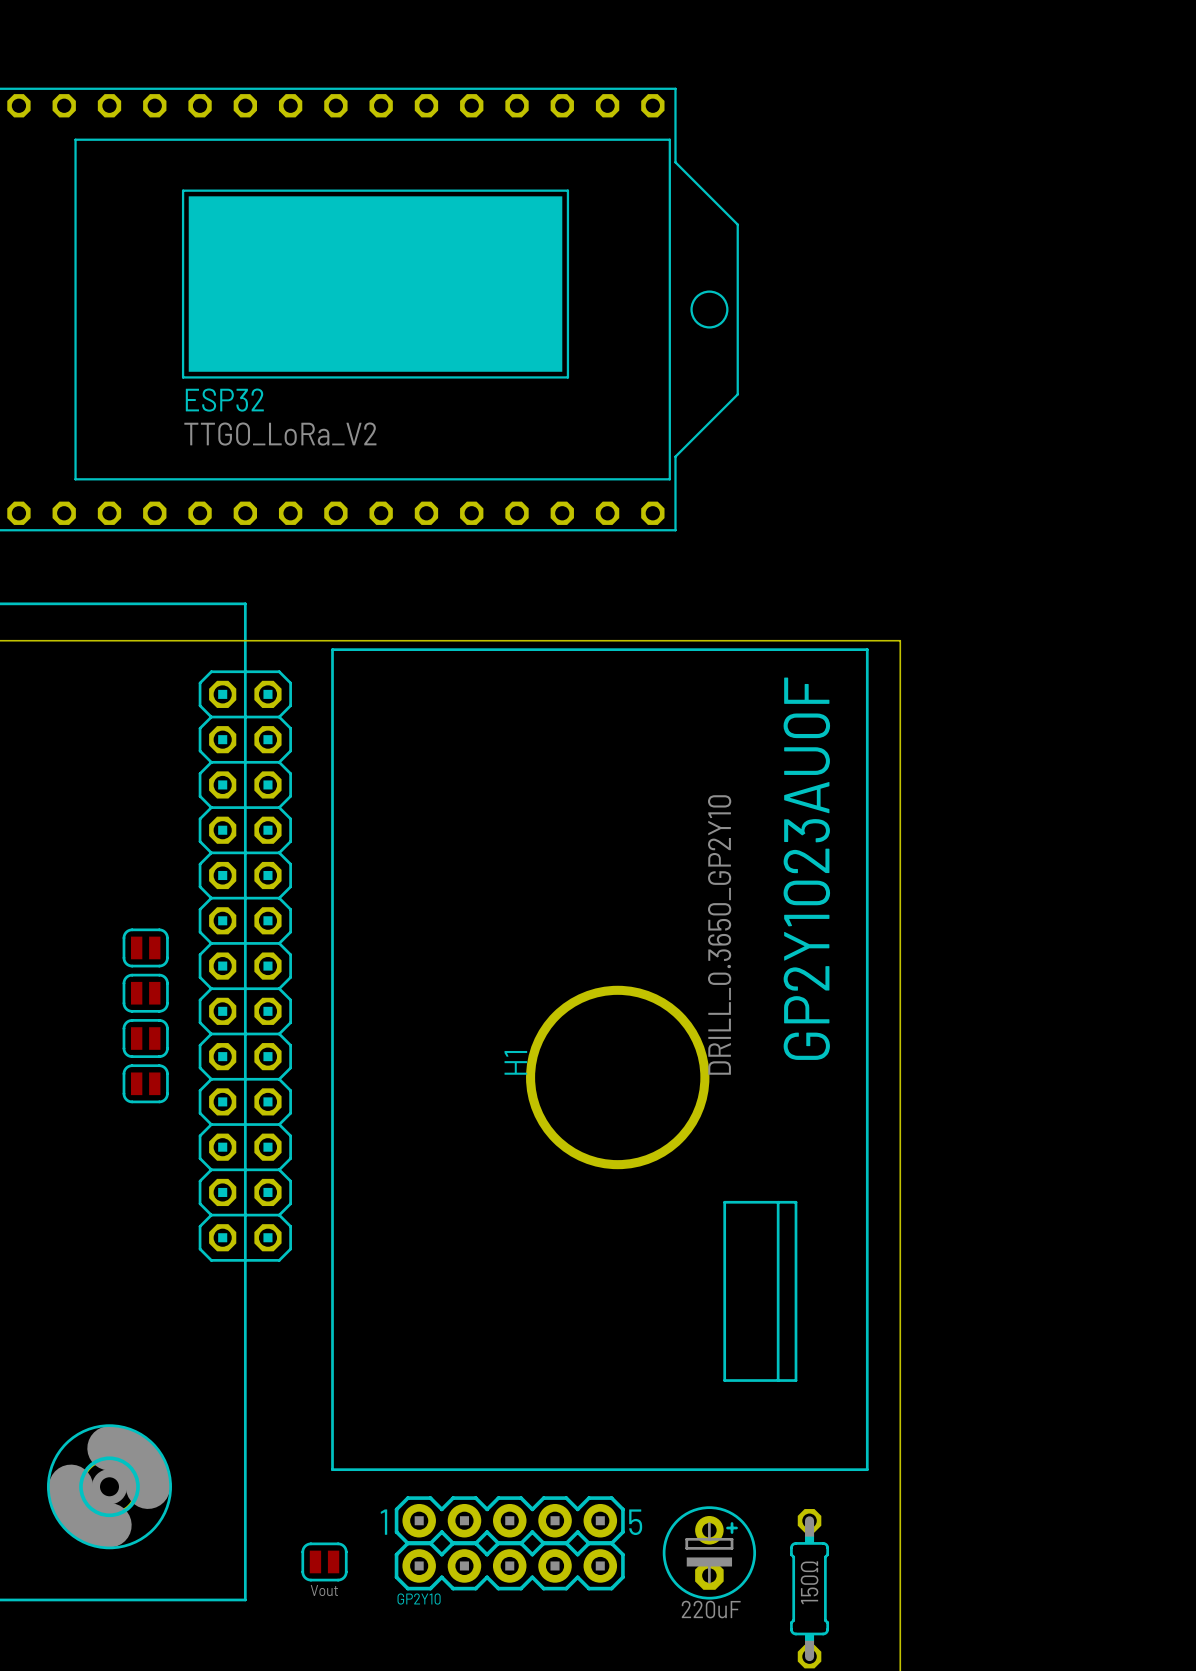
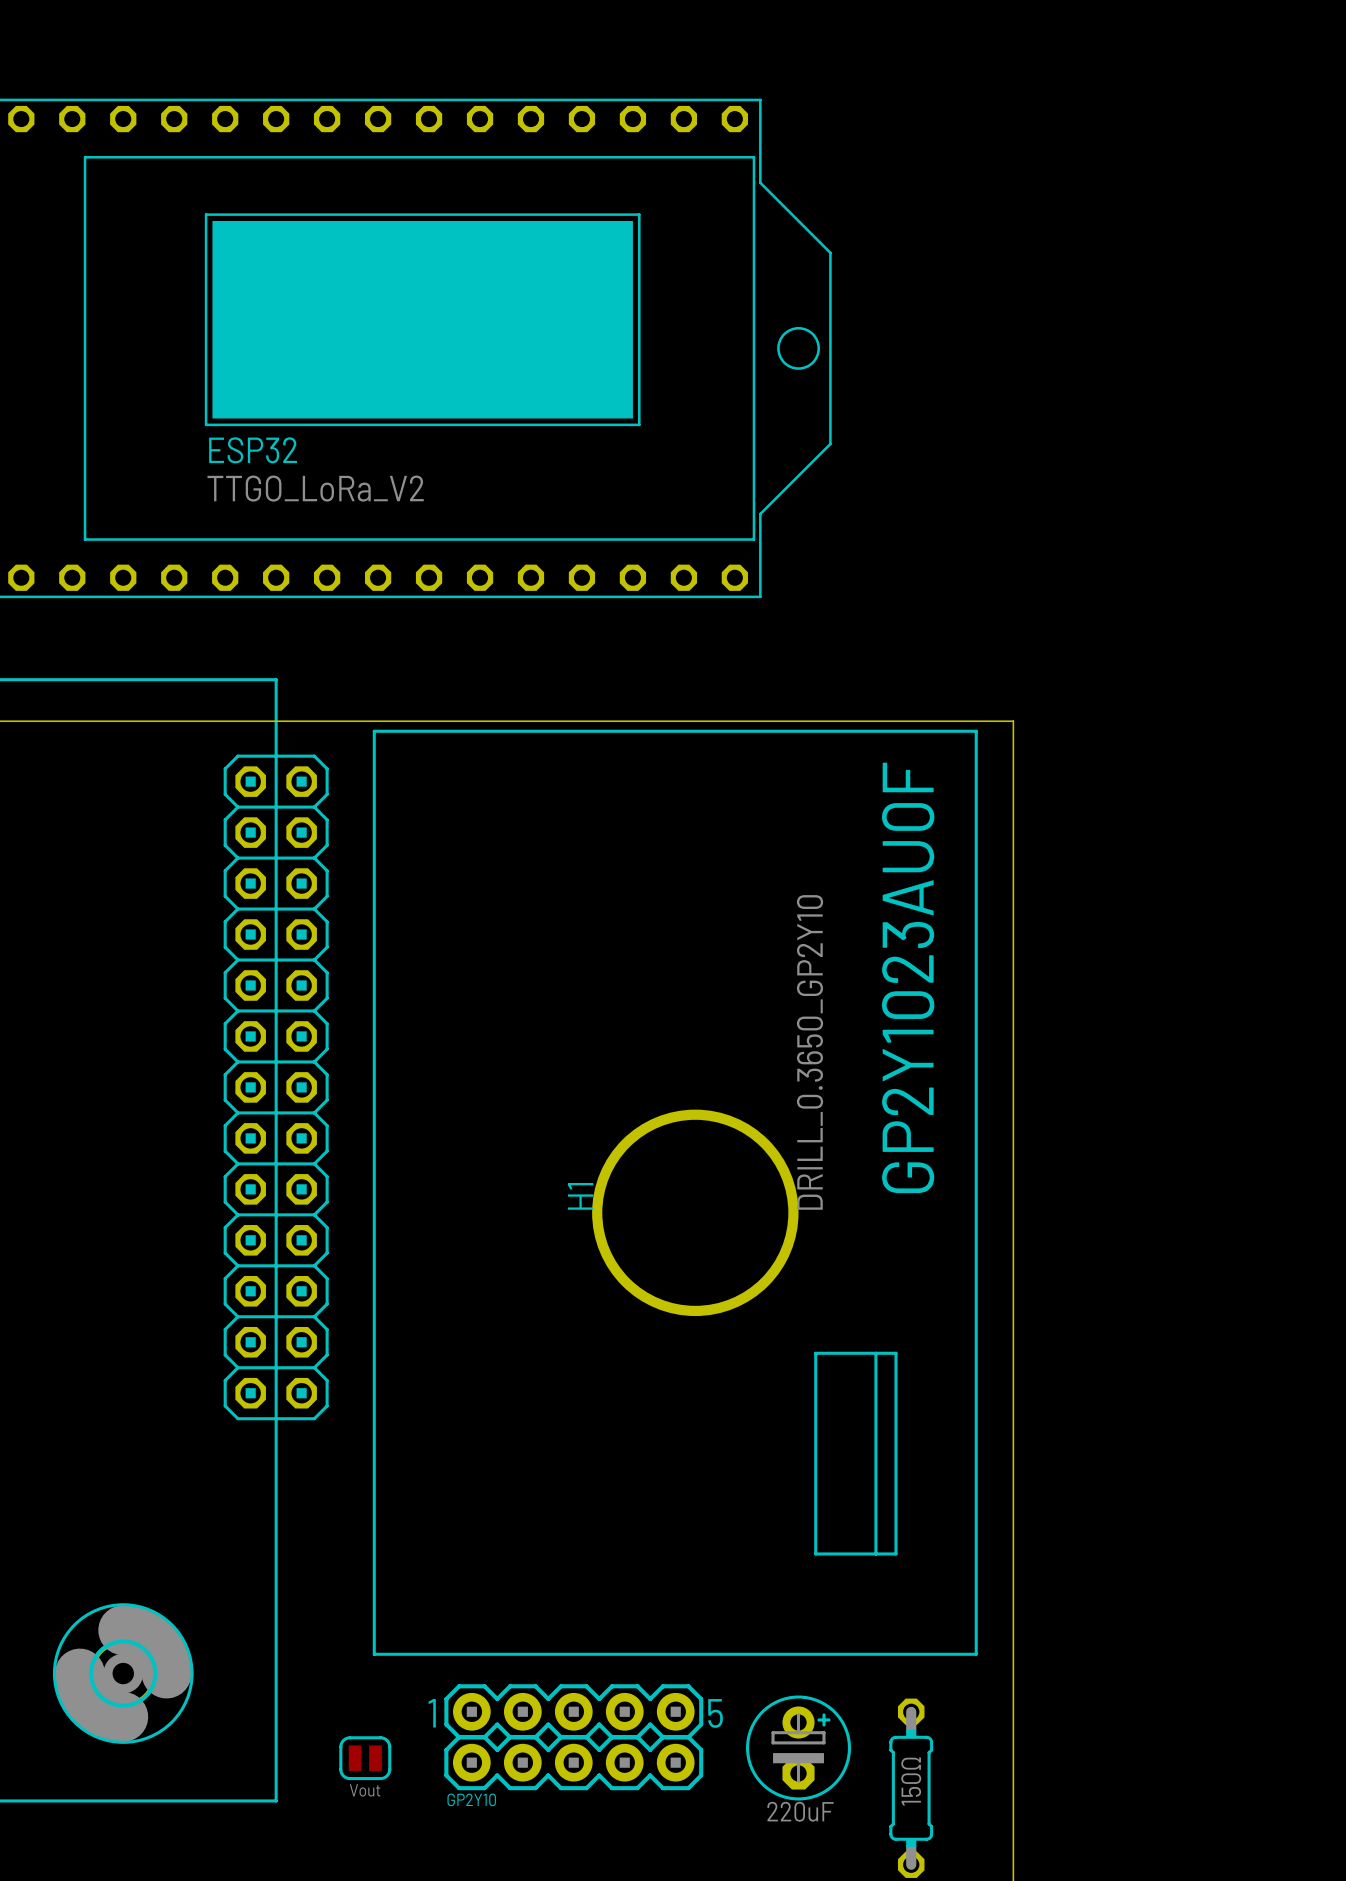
part: (145, 947) -> none
part: (145, 993) -> none
part: (145, 1038) -> none
part: (145, 1083) -> none

